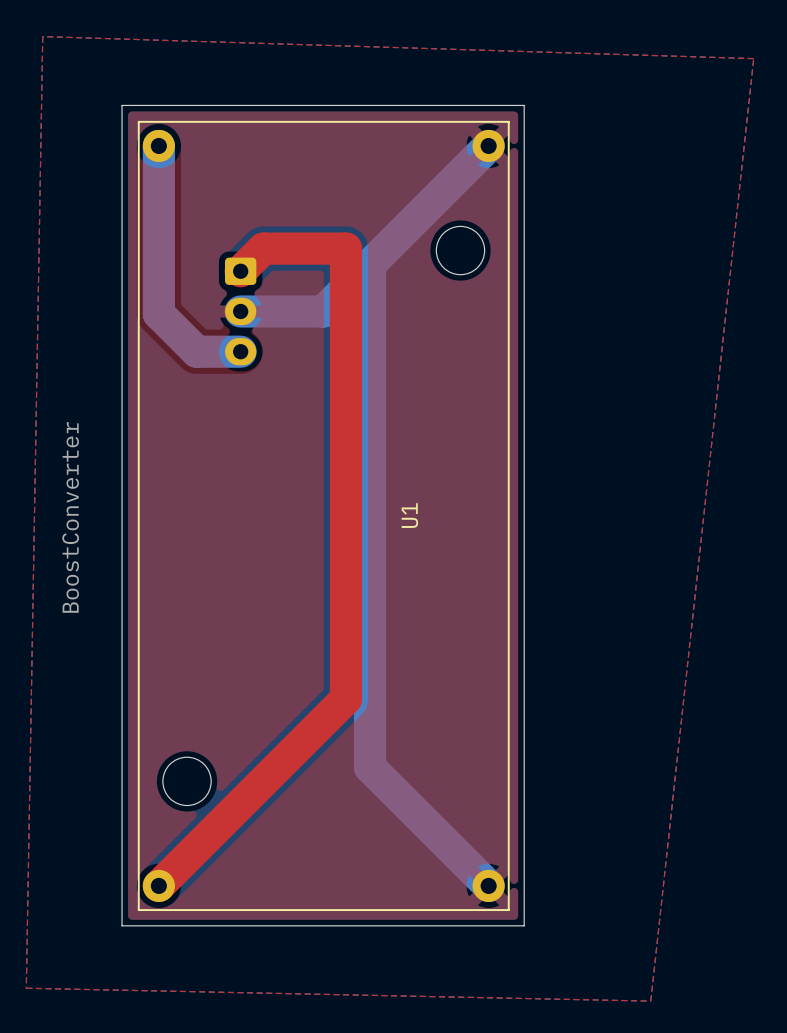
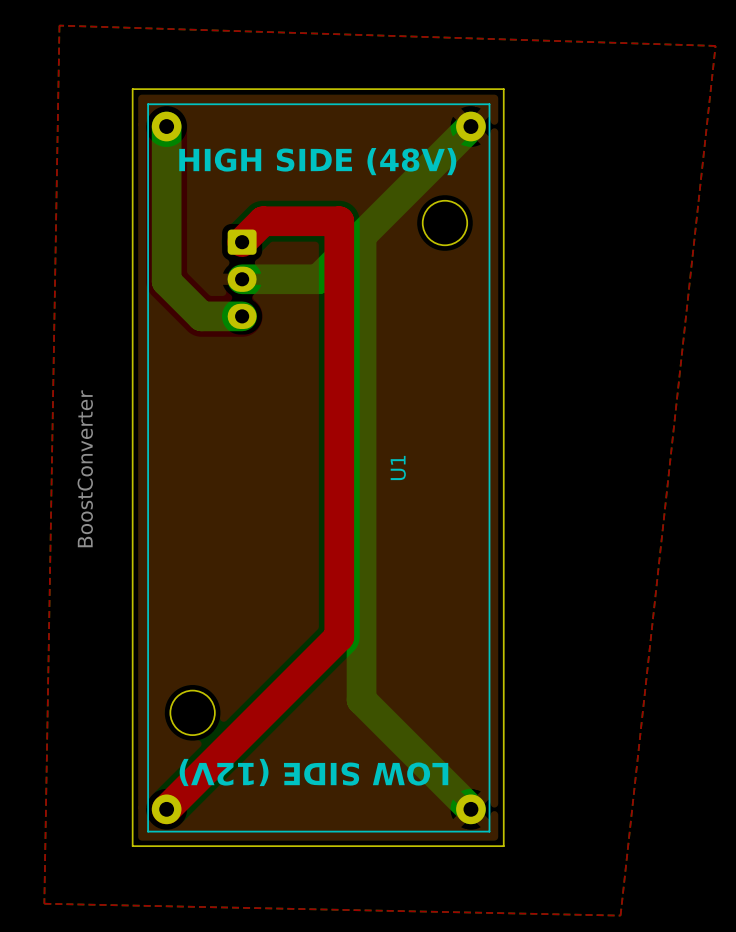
text: none -> HIGH SIDE (48V) (317, 161)
text: none -> LOW SIDE (12V) (313, 772)

